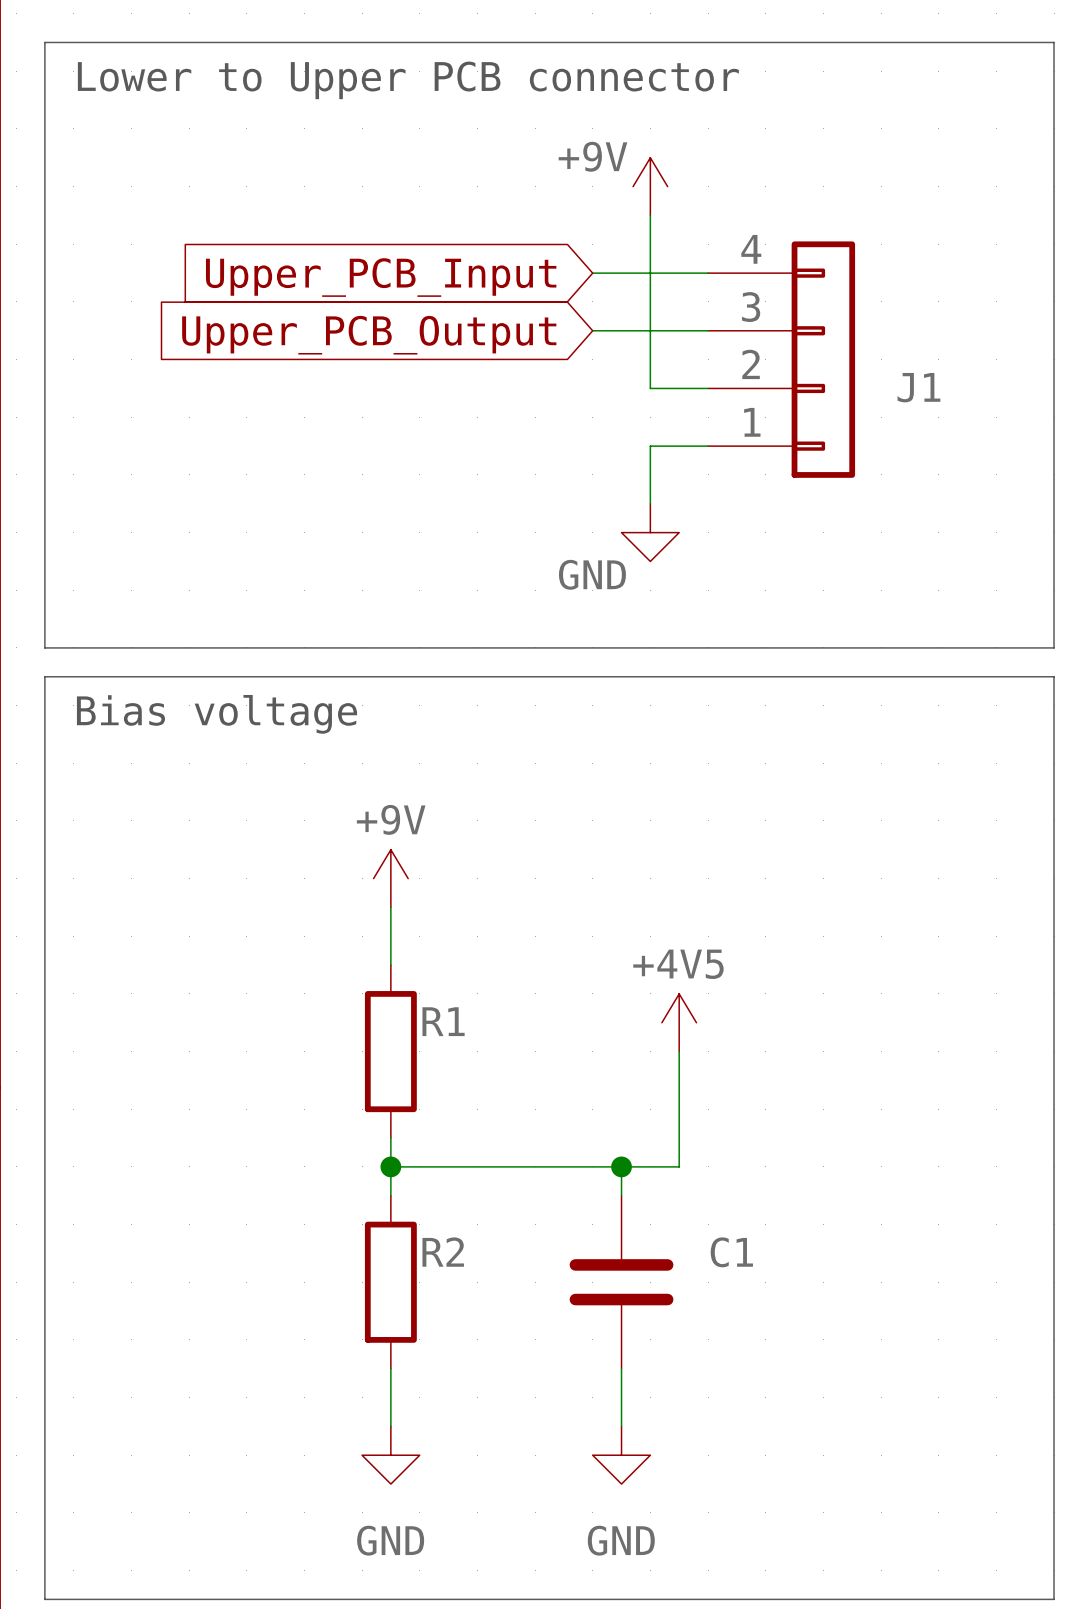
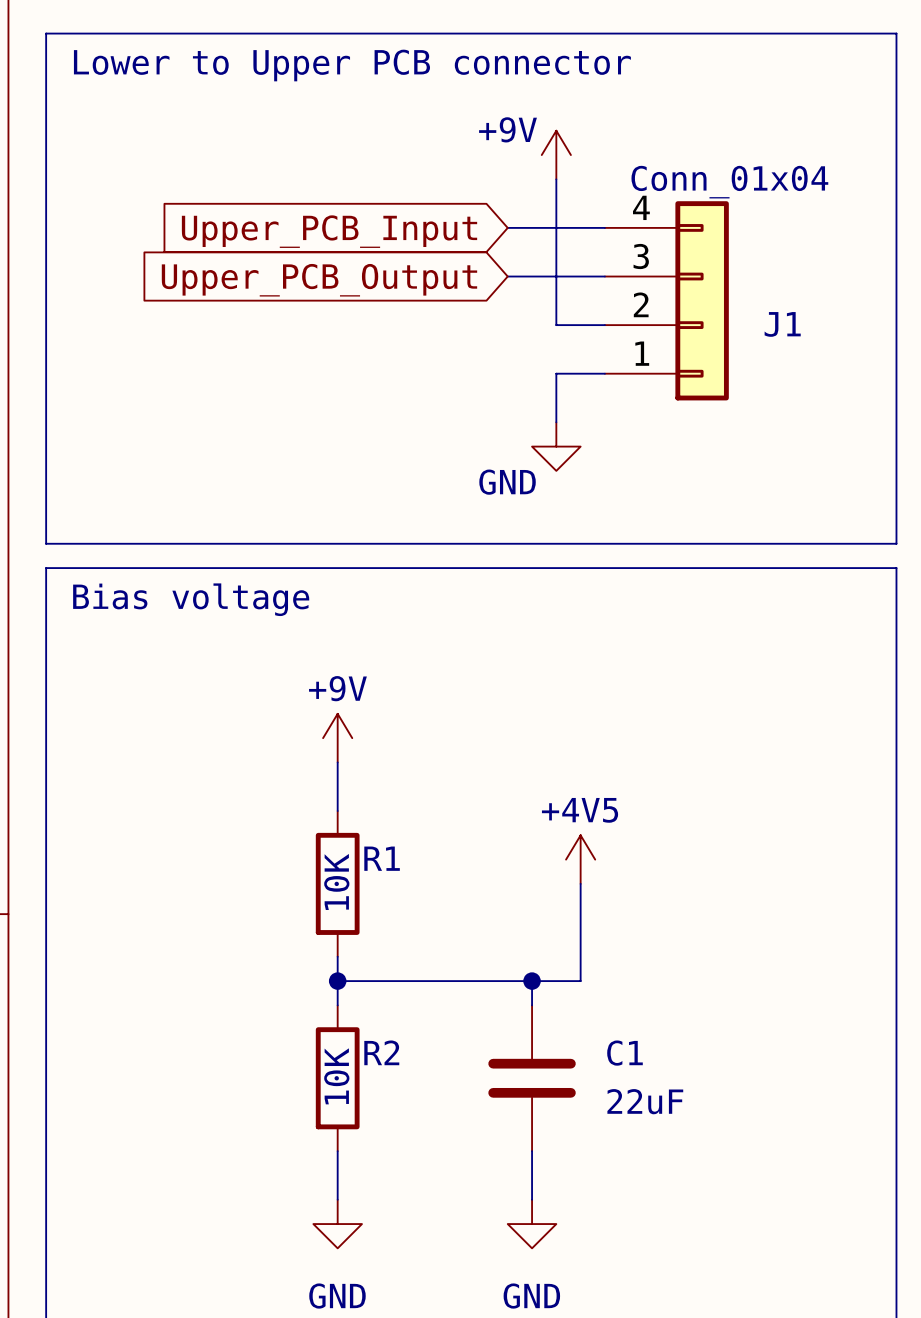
J1 value: none -> Conn_01x04 (729, 182)
R1 value: none -> 10K (336, 881)
R2 value: none -> 10K (336, 1076)
C1 value: none -> 22uF (645, 1101)

